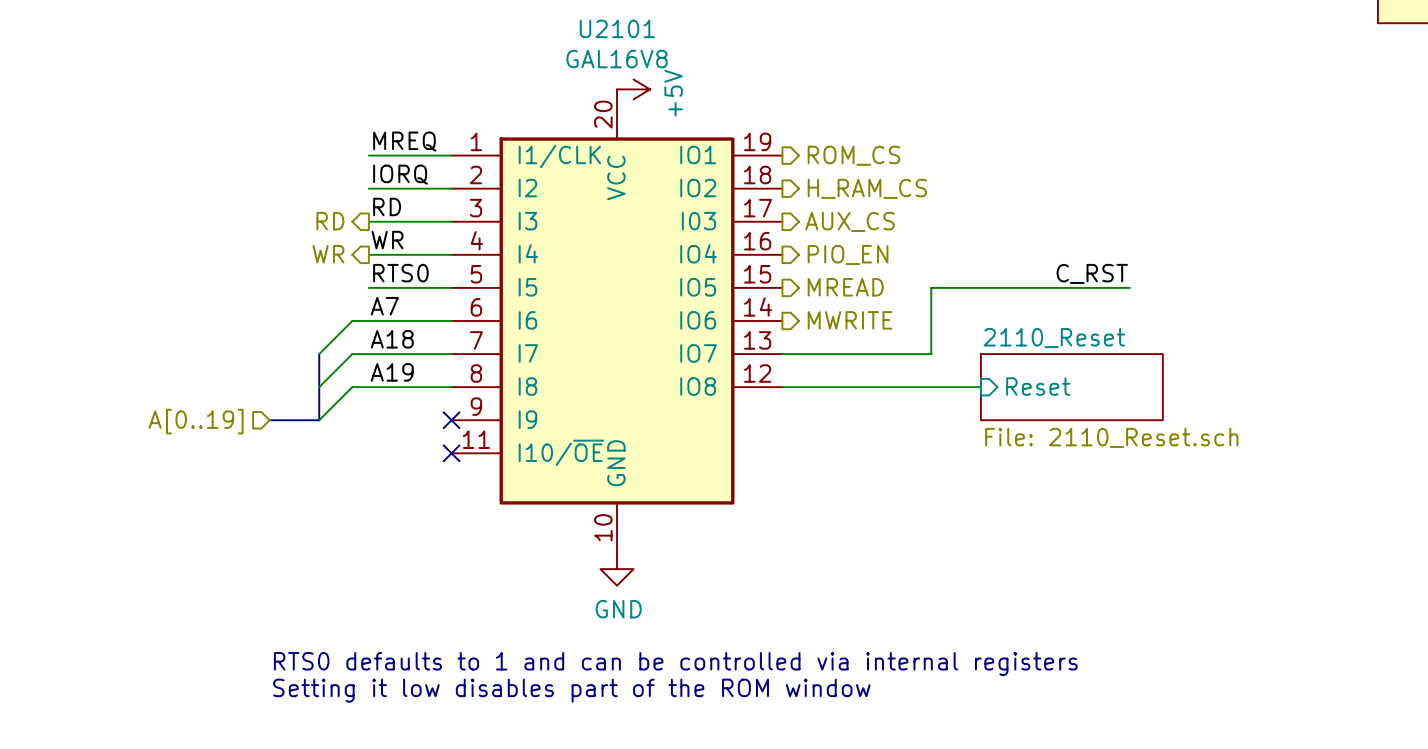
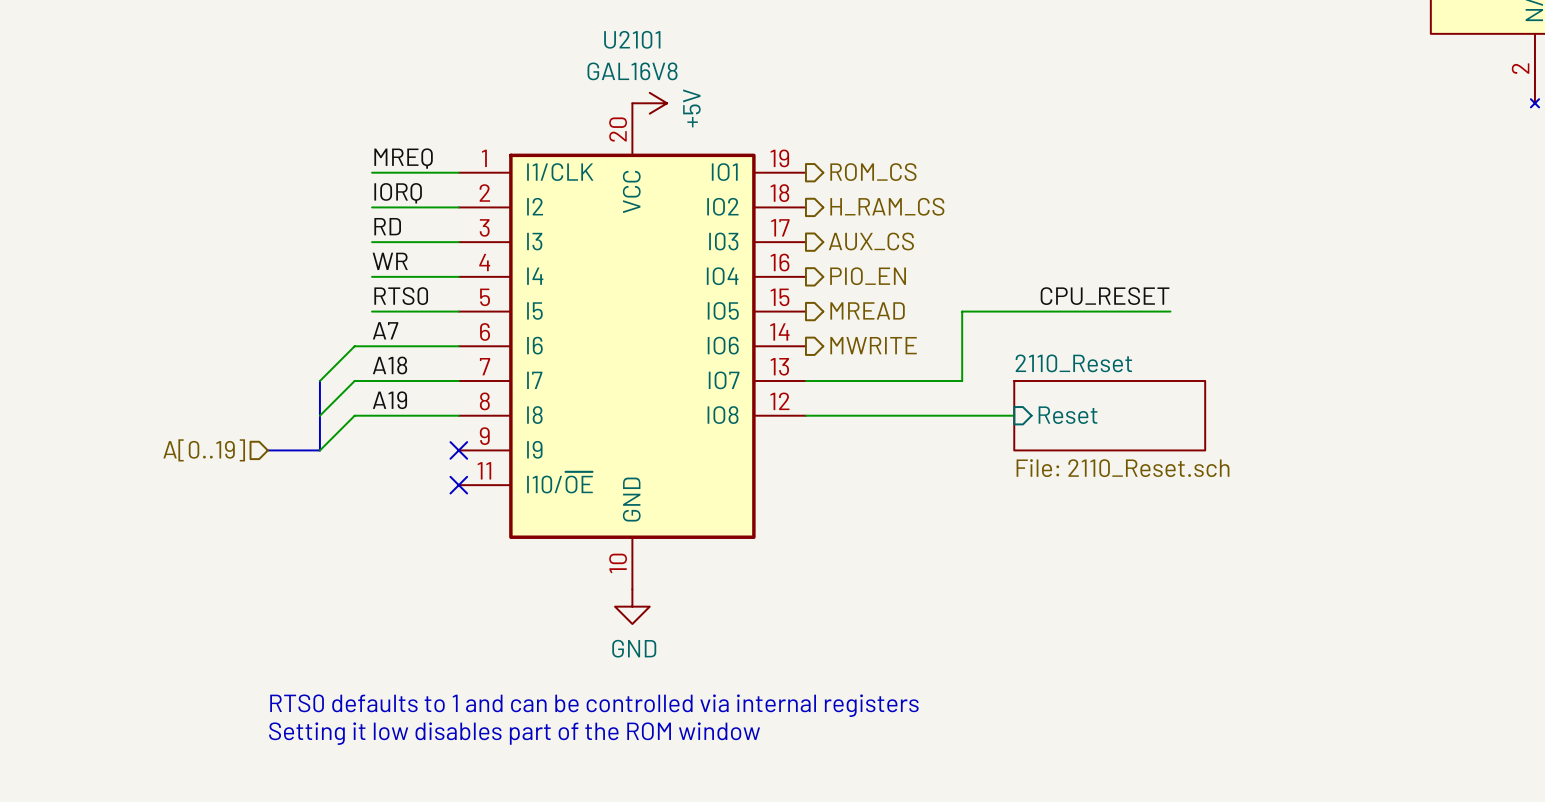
hierarchical label: RD (330, 221) -> none
hierarchical label: WR (328, 254) -> none
label: C_RST (1092, 273) -> CPU_RESET (1105, 296)

